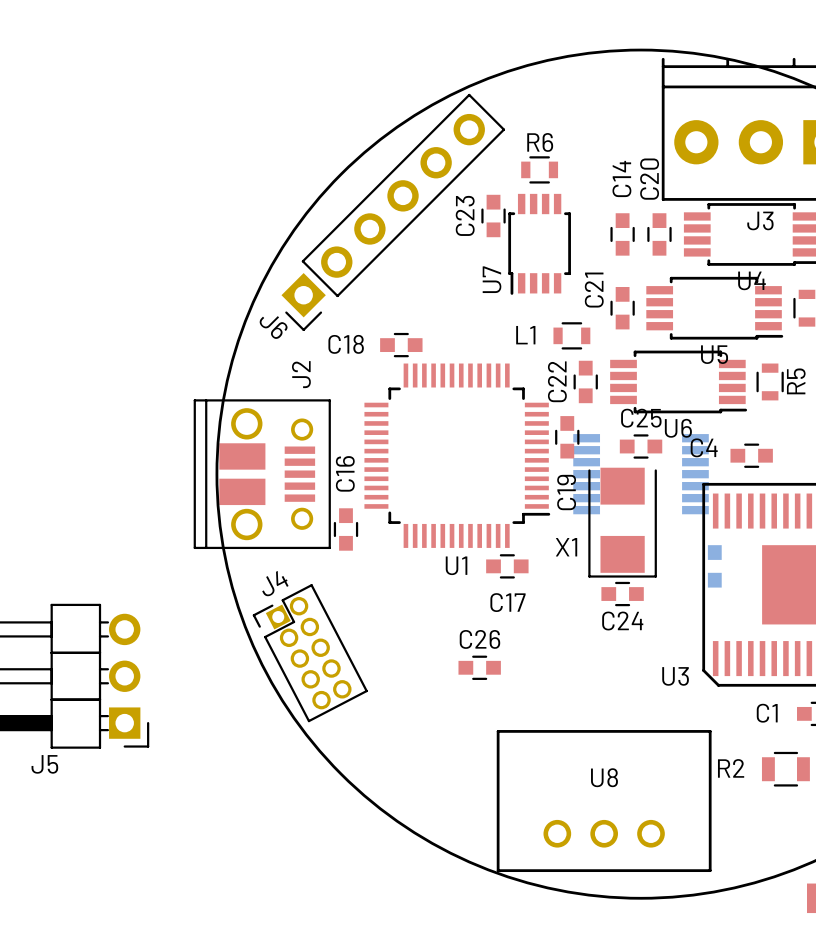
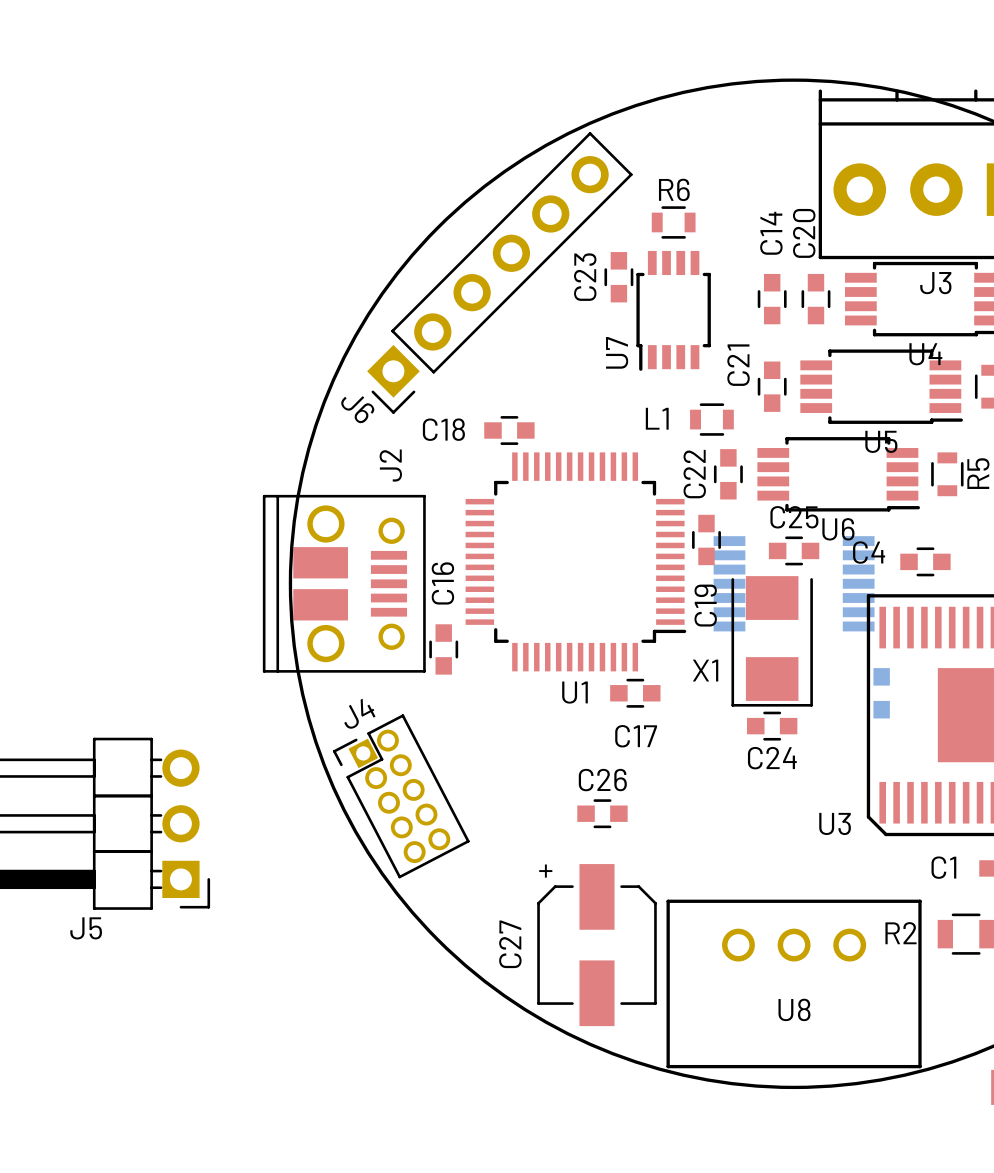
C27: none -> (597, 945)
U8 rotation: 0° (604, 801) -> 180° (794, 983)

